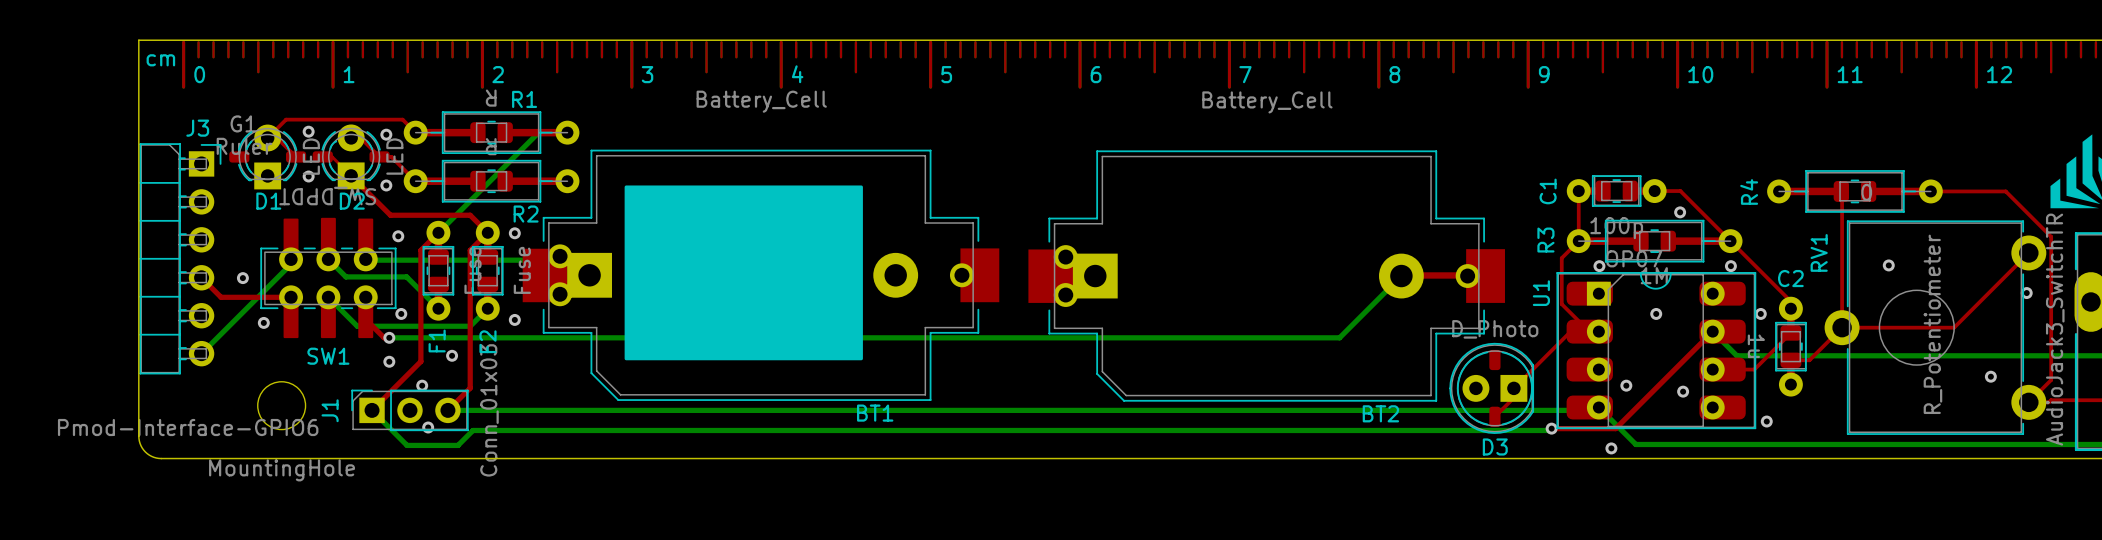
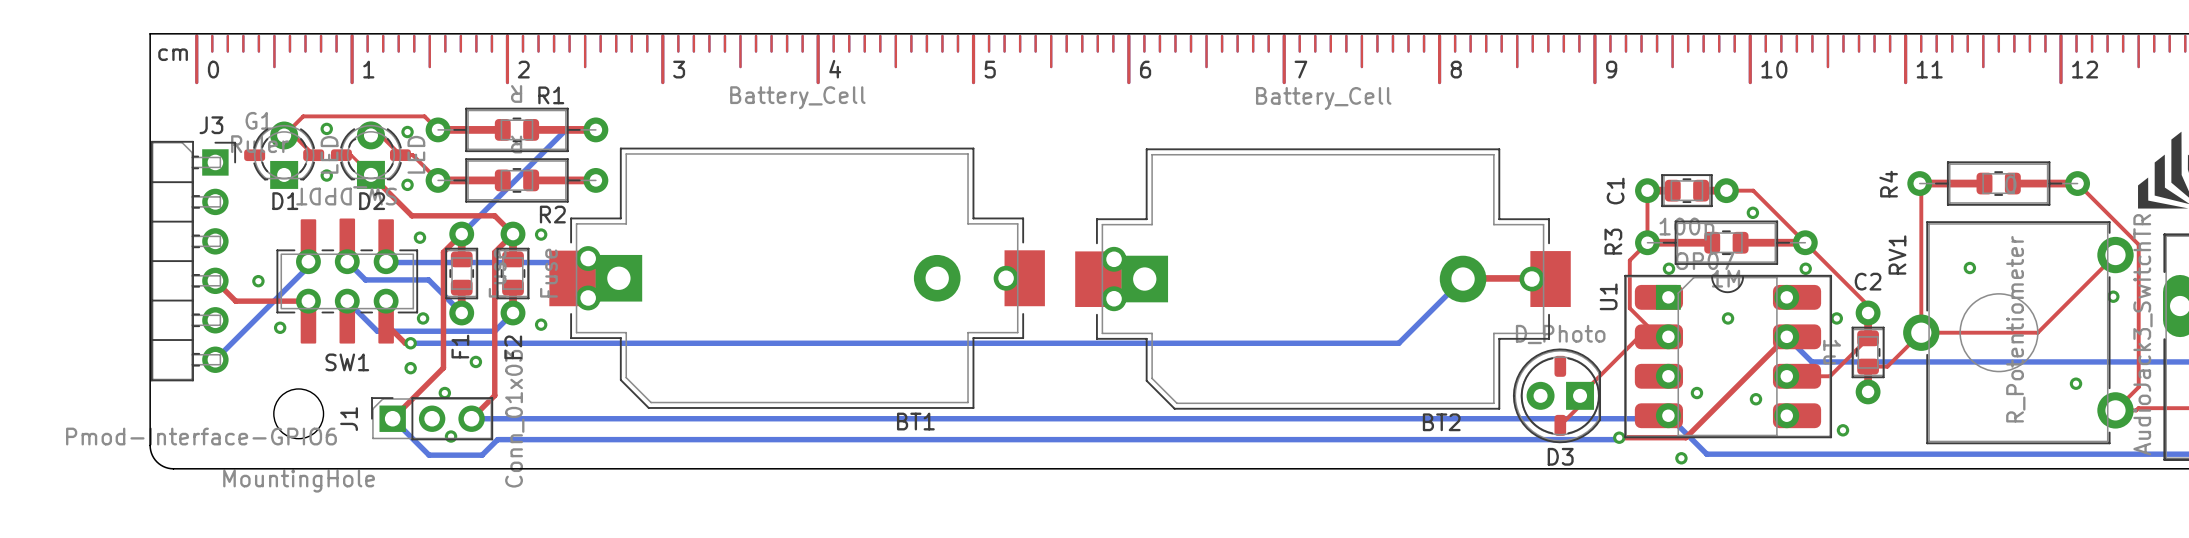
drawing: [624, 185, 863, 361] -> none
R4 position: (1854, 191) -> (1998, 183)
top track: (1930, 191) (2005, 191) (2051, 236) (2051, 243) -> (2077, 183) (2138, 244)

